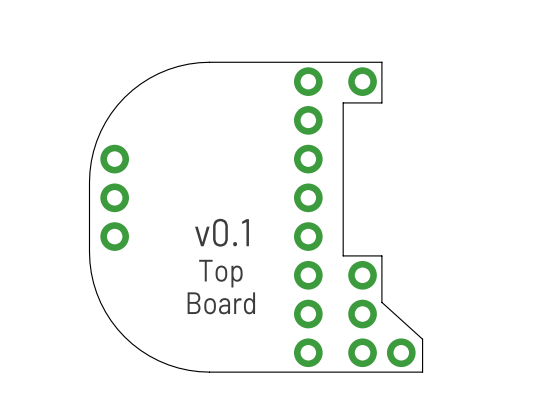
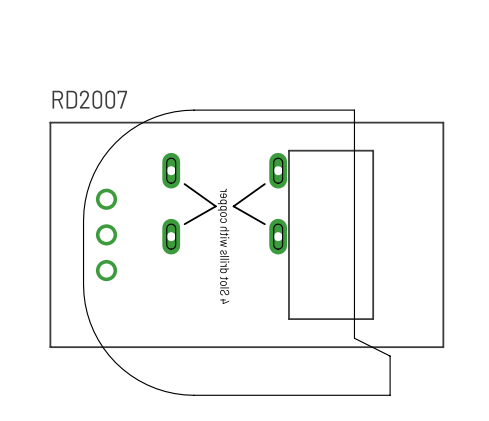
board edge: (381, 62) (381, 102) (343, 102) (343, 255) (381, 255) (381, 302) (422, 339) -> (352, 110) (354, 110) (354, 338) (390, 356) (390, 364)
part: (308, 81) -> none
part: (362, 81) -> none
part: (308, 120) -> none
part: (114, 159) -> none
part: (308, 159) -> none
part: none -> (224, 203)
part: (114, 197) -> none
RD2007: none -> (246, 234)
part: (308, 197) -> none
text: v0.1 (222, 232) -> none
part: (114, 236) -> none
part: (308, 236) -> none
text: Top (220, 273) -> none
part: (308, 275) -> none
part: (362, 275) -> none
text: Board (221, 303) -> none
part: (308, 314) -> none
part: (362, 314) -> none
part: (308, 352) -> none
part: (362, 352) -> none
part: (401, 352) -> none

